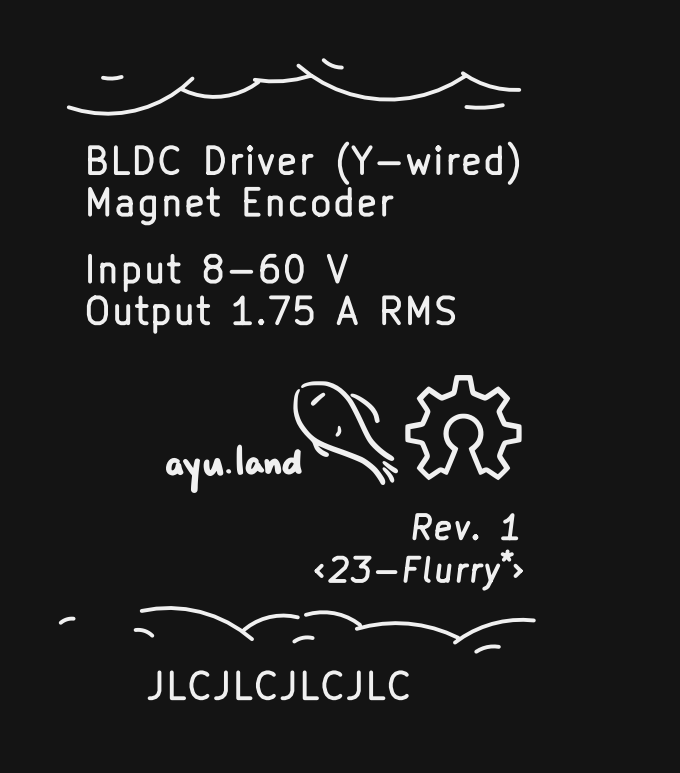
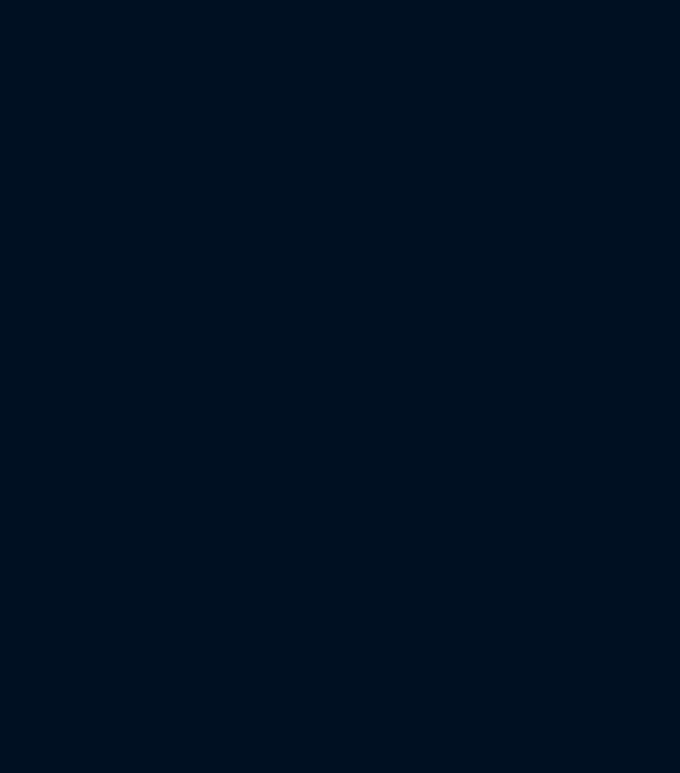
line: (323, 60) (332, 65) (341, 67) -> none
line: (298, 65) (322, 82) (336, 89) (350, 94) (379, 99) (394, 99) (424, 94) (451, 84) (464, 76) -> none
line: (462, 73) (489, 86) (519, 89) -> none
line: (310, 75) (282, 81) (254, 79) -> none
line: (121, 76) (102, 77) -> none
line: (192, 78) (159, 101) (134, 110) (94, 113) (68, 107) -> none
line: (258, 82) (236, 93) (220, 96) (204, 96) (181, 89) -> none
line: (502, 105) (484, 107) (466, 106) -> none
text: BLDC Driver (Y-wired) (303, 163) -> none
text: Magnet Encoder (240, 206) -> none
text: Input 8-60 V (218, 273) -> none
text: Output 1.75 A RMS (270, 314) -> none
drawing: [166, 375, 522, 493] -> none
text: Rev. 1 (465, 526) -> none
text: * (507, 555) -> none
line: (321, 565) (316, 570) (321, 576) -> none
line: (515, 565) (520, 570) (515, 576) -> none
text: 23-Flurry (414, 573) -> none
line: (141, 610) (171, 608) (200, 611) (227, 622) (252, 639) -> none
line: (305, 614) (319, 612) (334, 613) (347, 617) (359, 624) -> none
line: (297, 617) (283, 615) (269, 617) (256, 621) (244, 629) -> none
line: (73, 618) (60, 622) -> none
line: (533, 620) (512, 620) (492, 623) (472, 631) (454, 642) -> none
line: (356, 628) (382, 623) (408, 623) (433, 628) (458, 637) -> none
line: (135, 630) (144, 630) (152, 635) -> none
line: (312, 638) (303, 637) (294, 641) -> none
line: (498, 646) (487, 647) (476, 651) -> none
text: JLCJLCJLCJLC (278, 685) -> none

